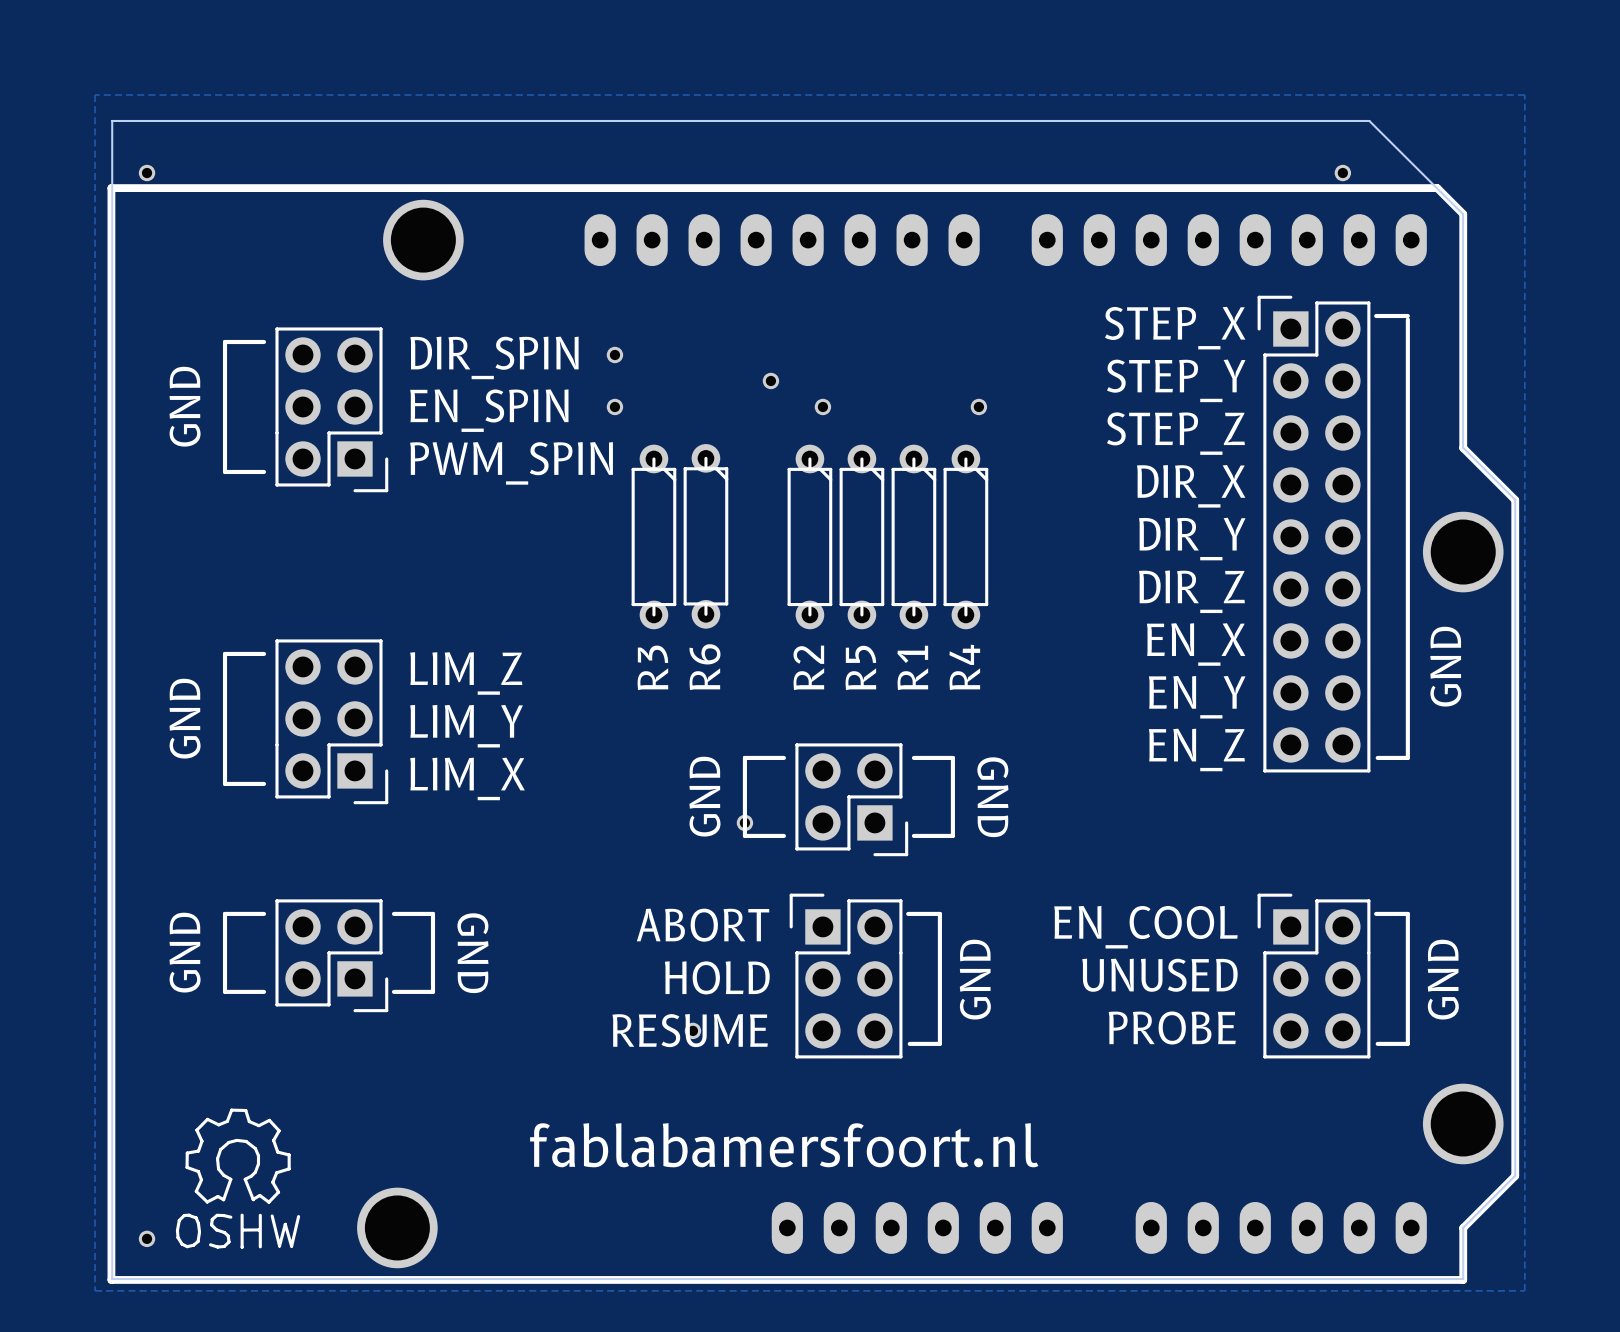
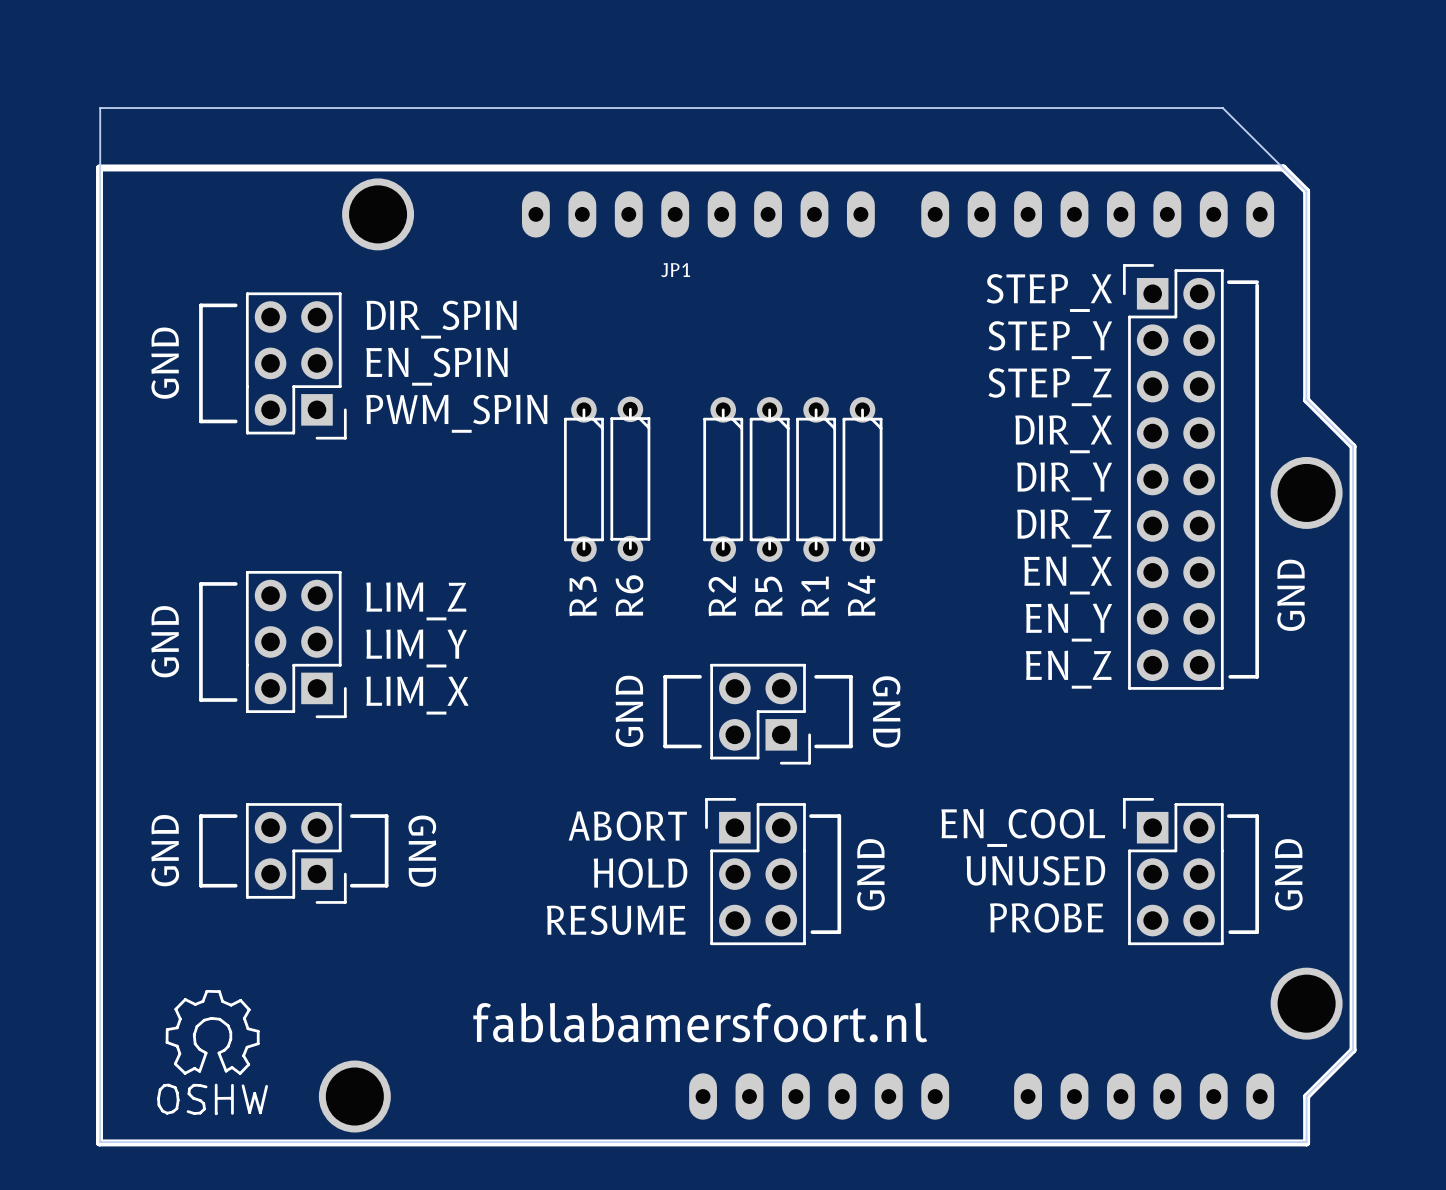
zone outline: (95, 95) (95, 1290) (1524, 1290) (1524, 95) (95, 95) -> none
part: (147, 173) -> none
part: (1342, 173) -> none
JP1: none -> (675, 270)
part: (614, 354) -> none
part: (770, 380) -> none
part: (614, 406) -> none
part: (822, 406) -> none
part: (978, 406) -> none
part: (744, 822) -> none
part: (692, 1030) -> none
part: (147, 1238) -> none

